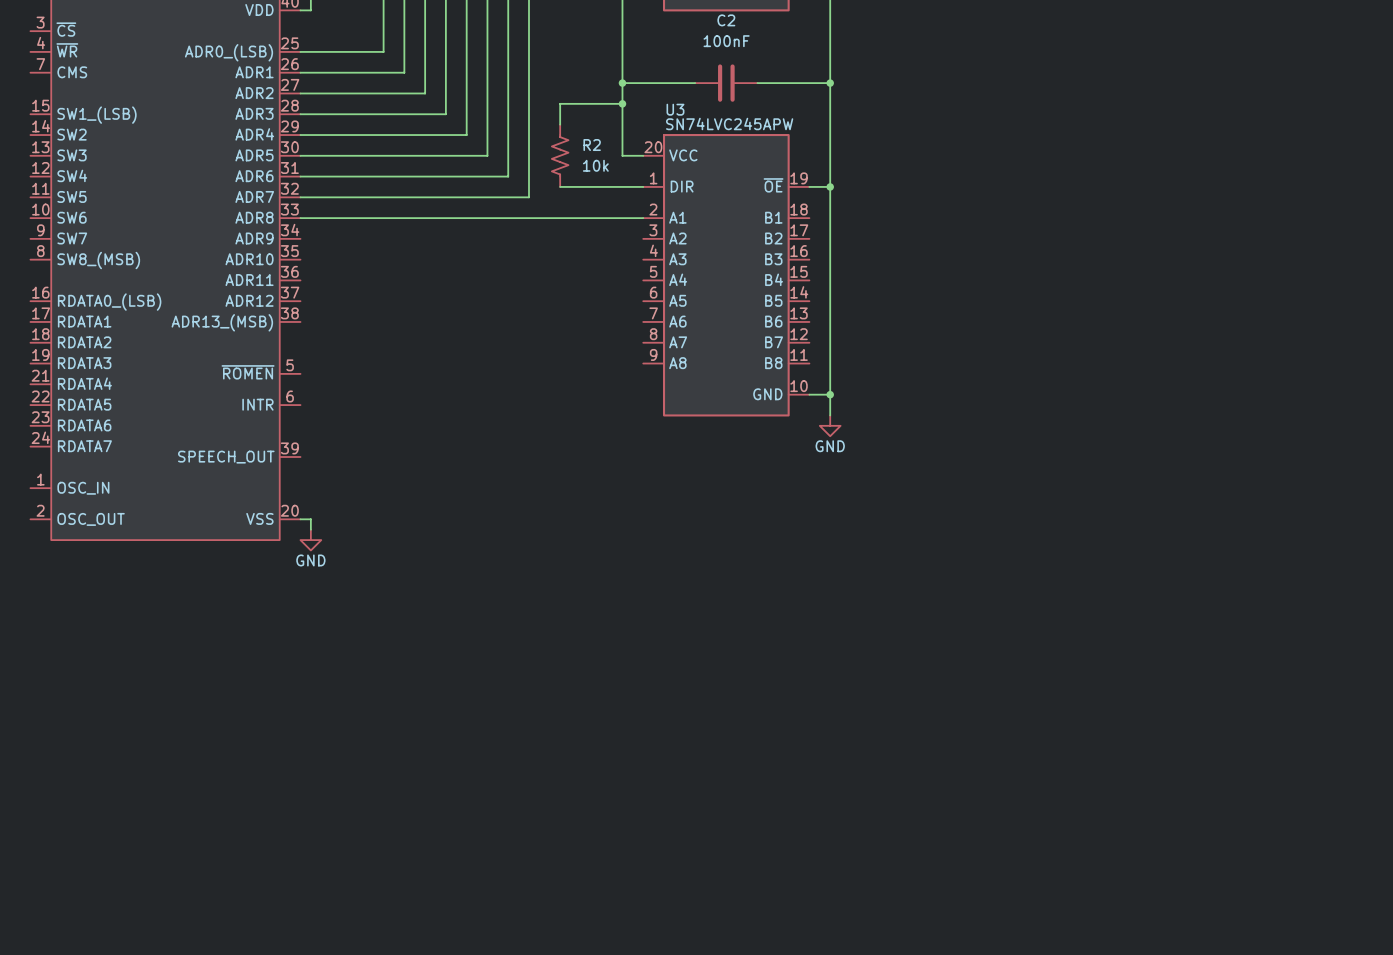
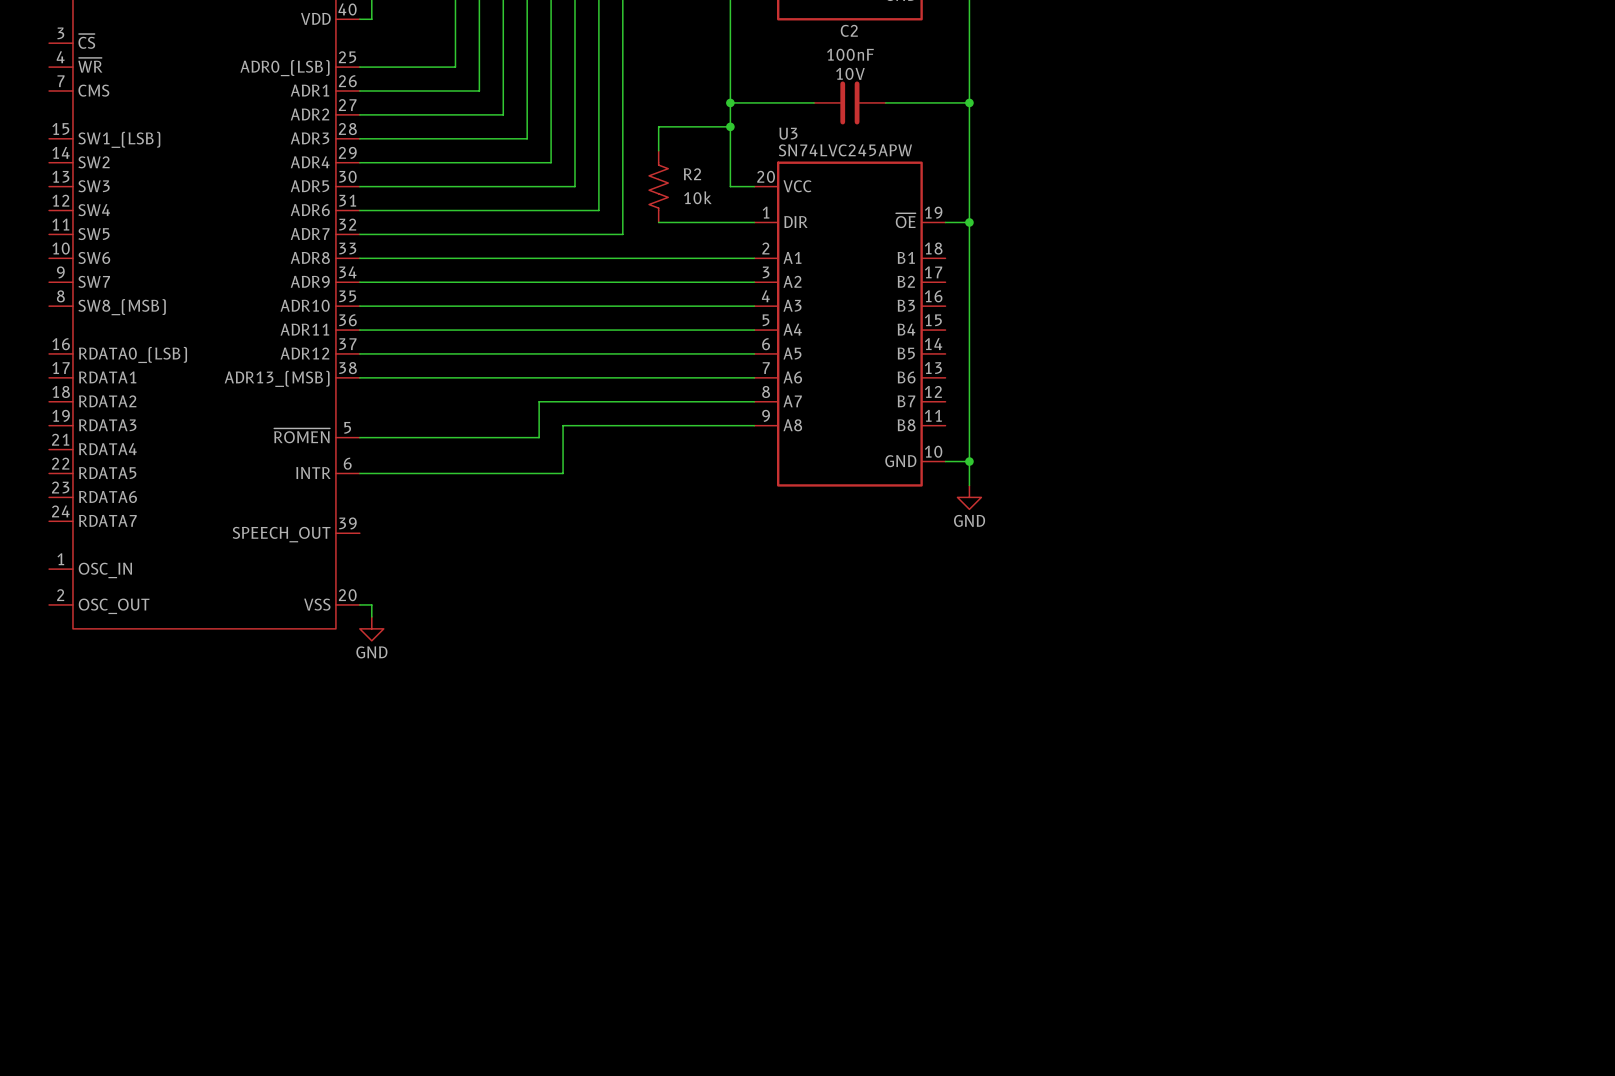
C2 text: none -> 10V (850, 73)
wire: none -> (359, 282) (754, 282)
wire: none -> (359, 306) (754, 306)
wire: none -> (359, 330) (754, 330)
wire: none -> (359, 353) (754, 353)
wire: none -> (359, 377) (754, 377)
wire: none -> (754, 401) (539, 401) (539, 437) (359, 437)
wire: none -> (754, 425) (563, 425) (563, 473) (359, 473)

